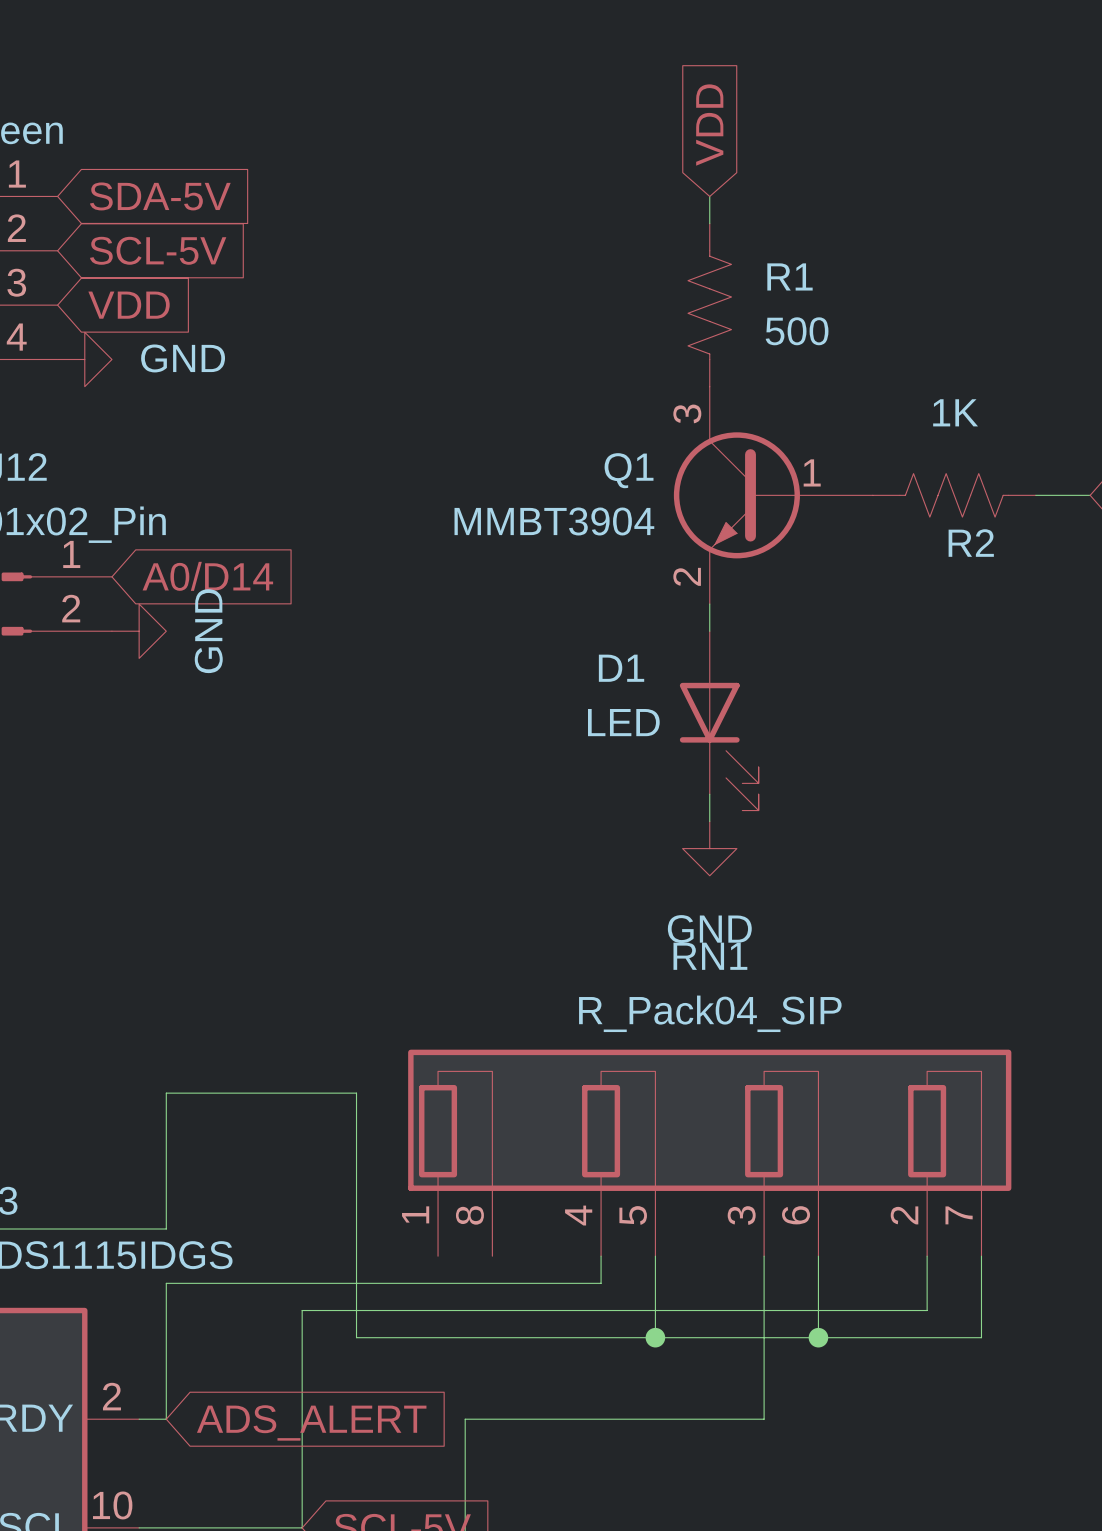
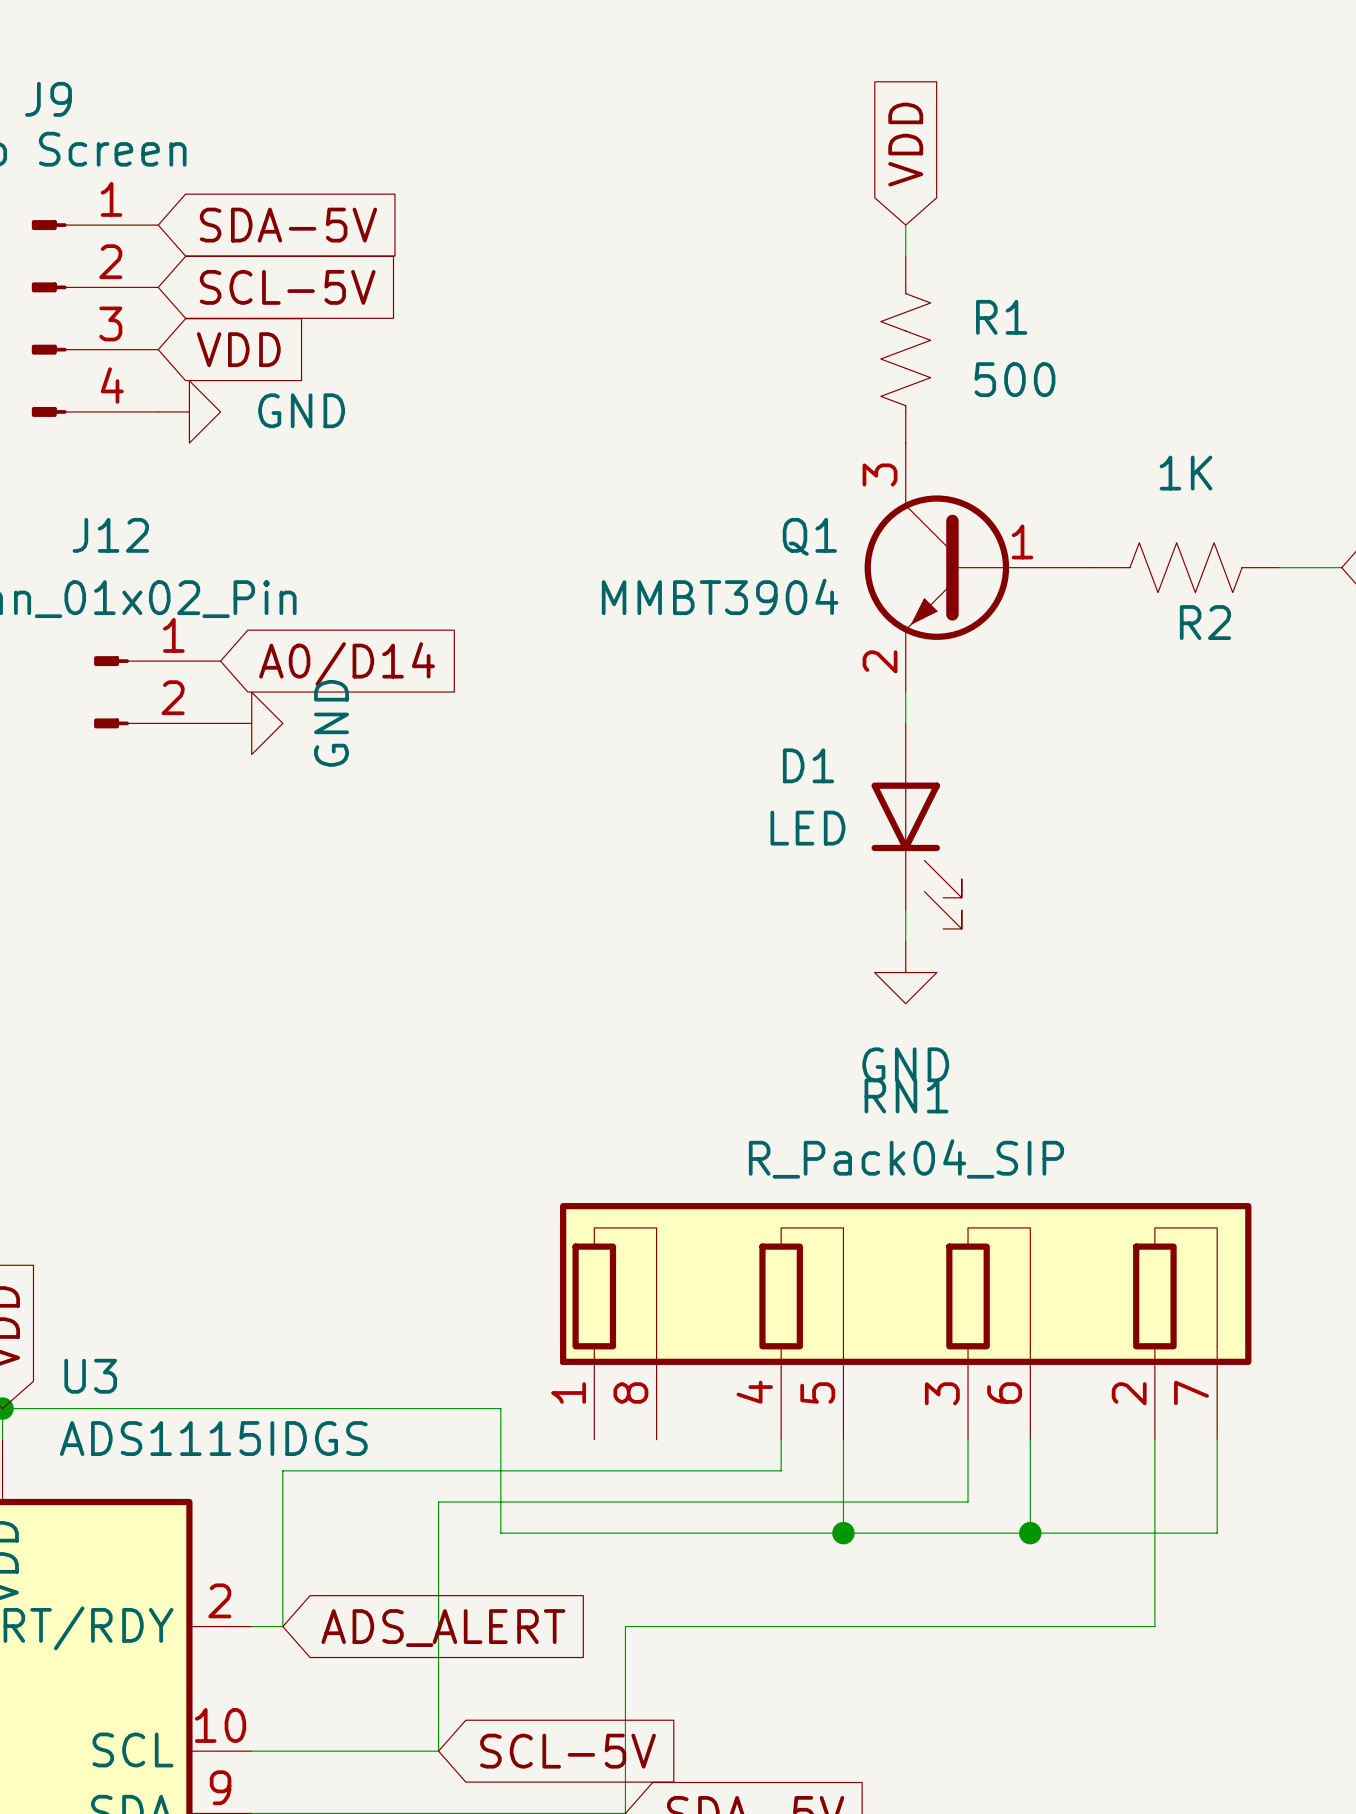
wire: (166, 1229) (166, 1093) (356, 1093) (356, 1229) -> (282, 1408) (500, 1408)
wire: (927, 1310) (764, 1310) (764, 1419) -> (1154, 1502) (1154, 1626) (968, 1626)

